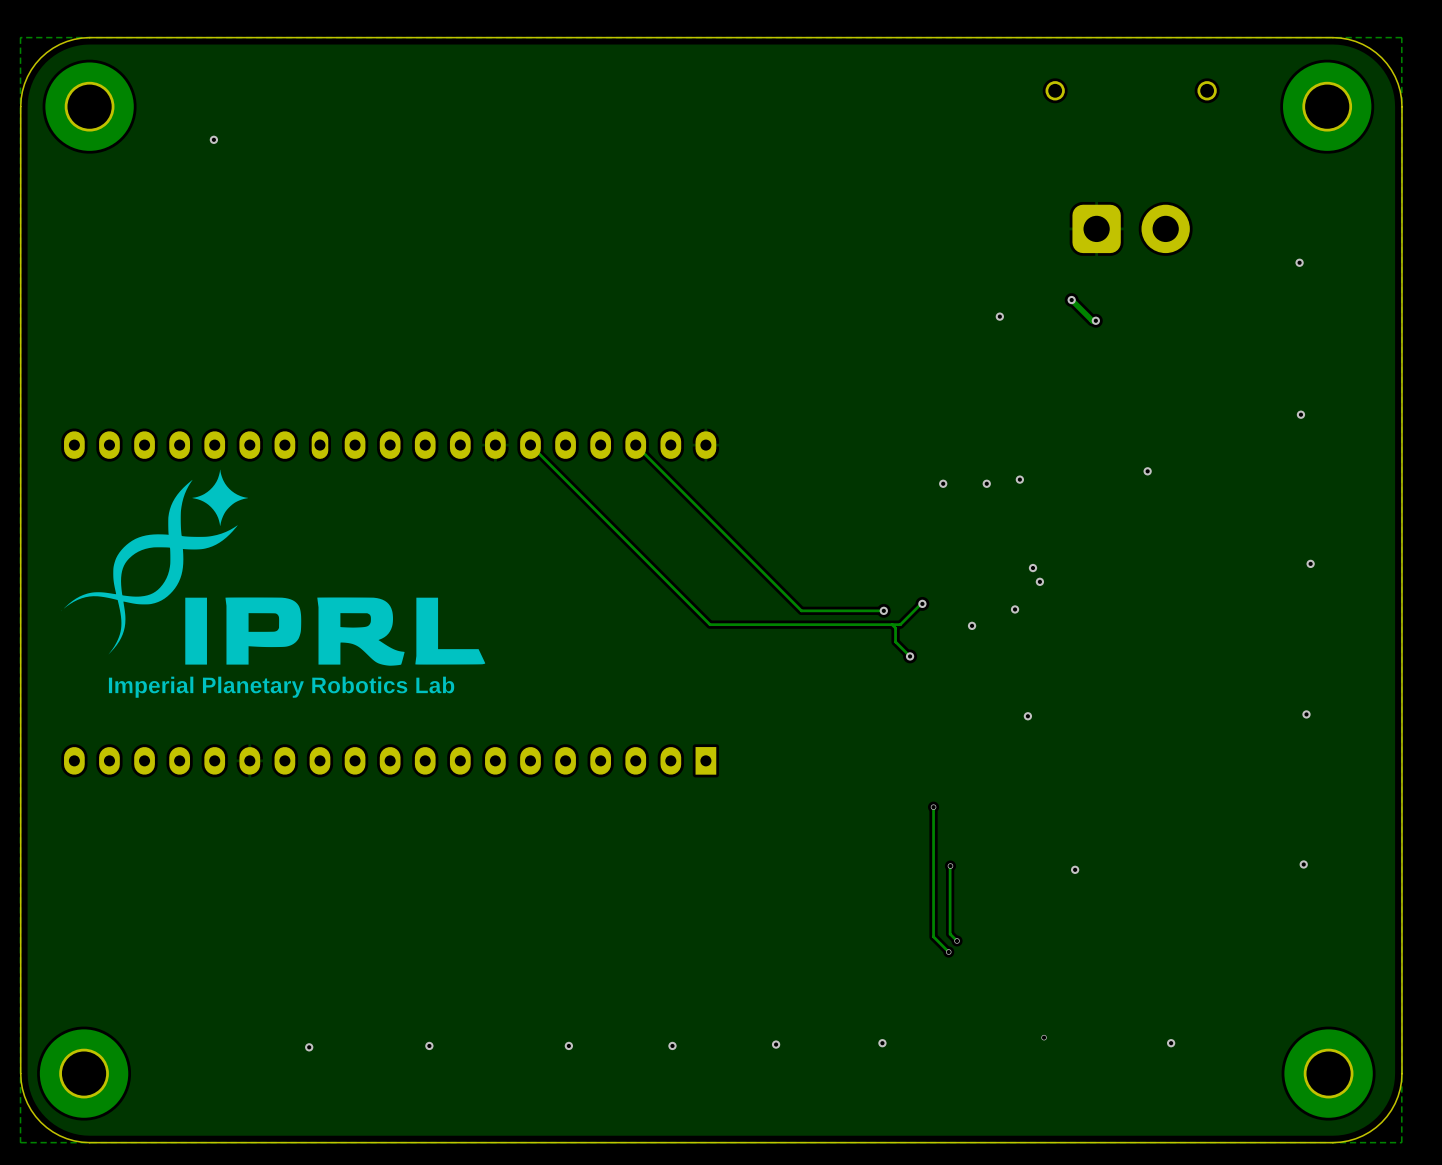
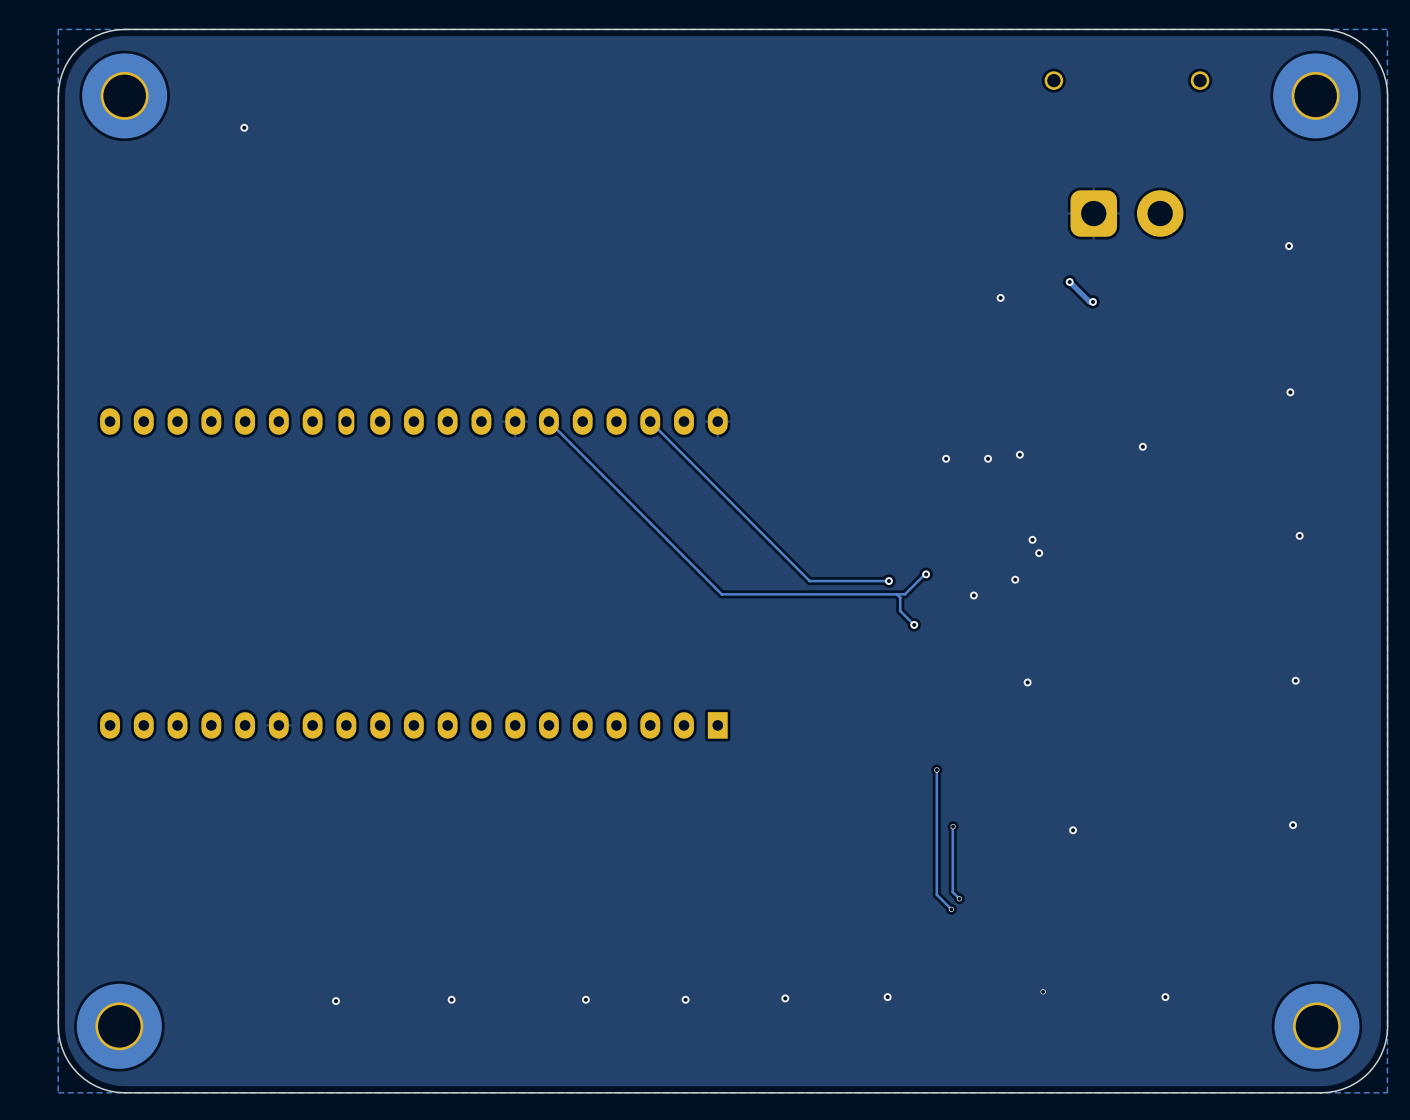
drawing: [61, 469, 486, 698] -> none

